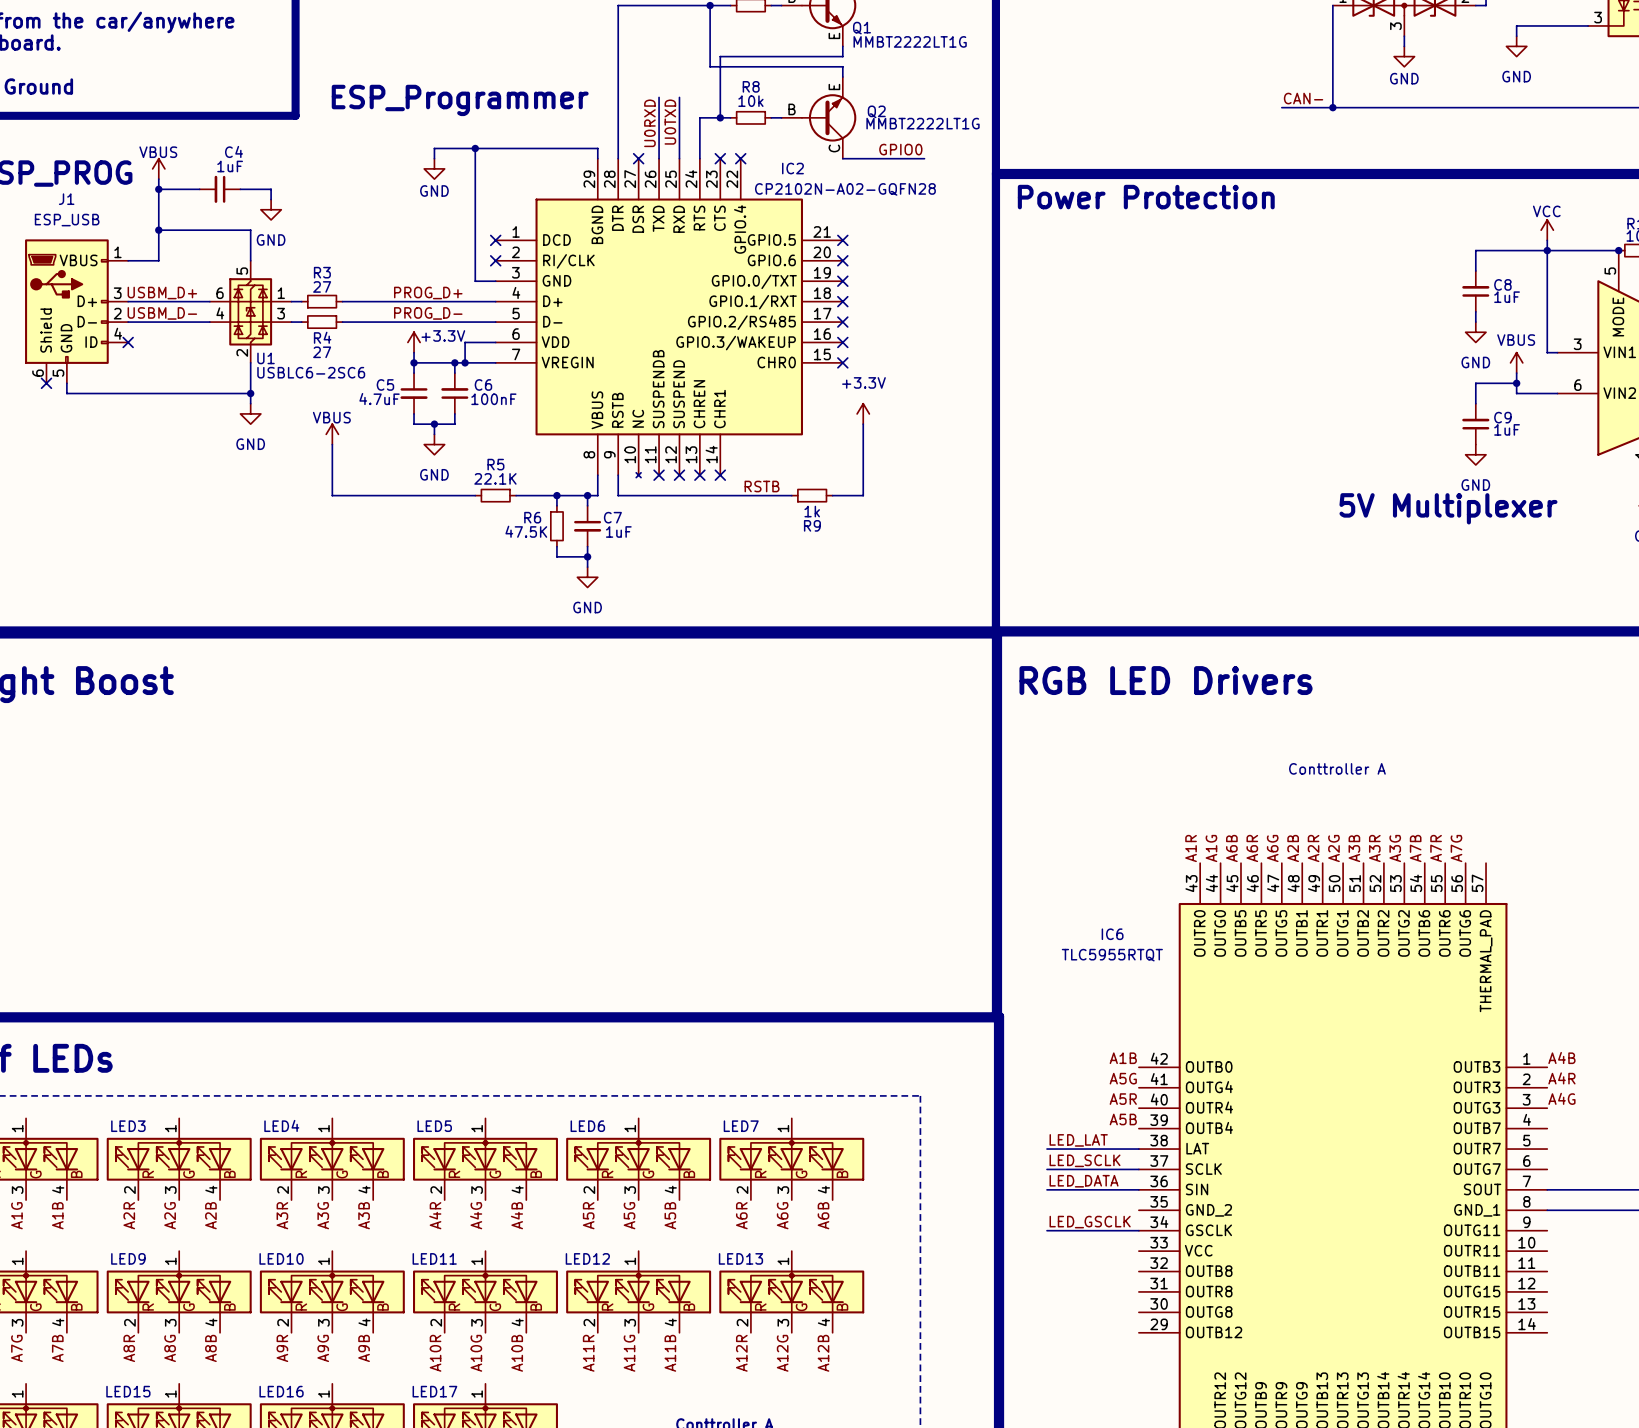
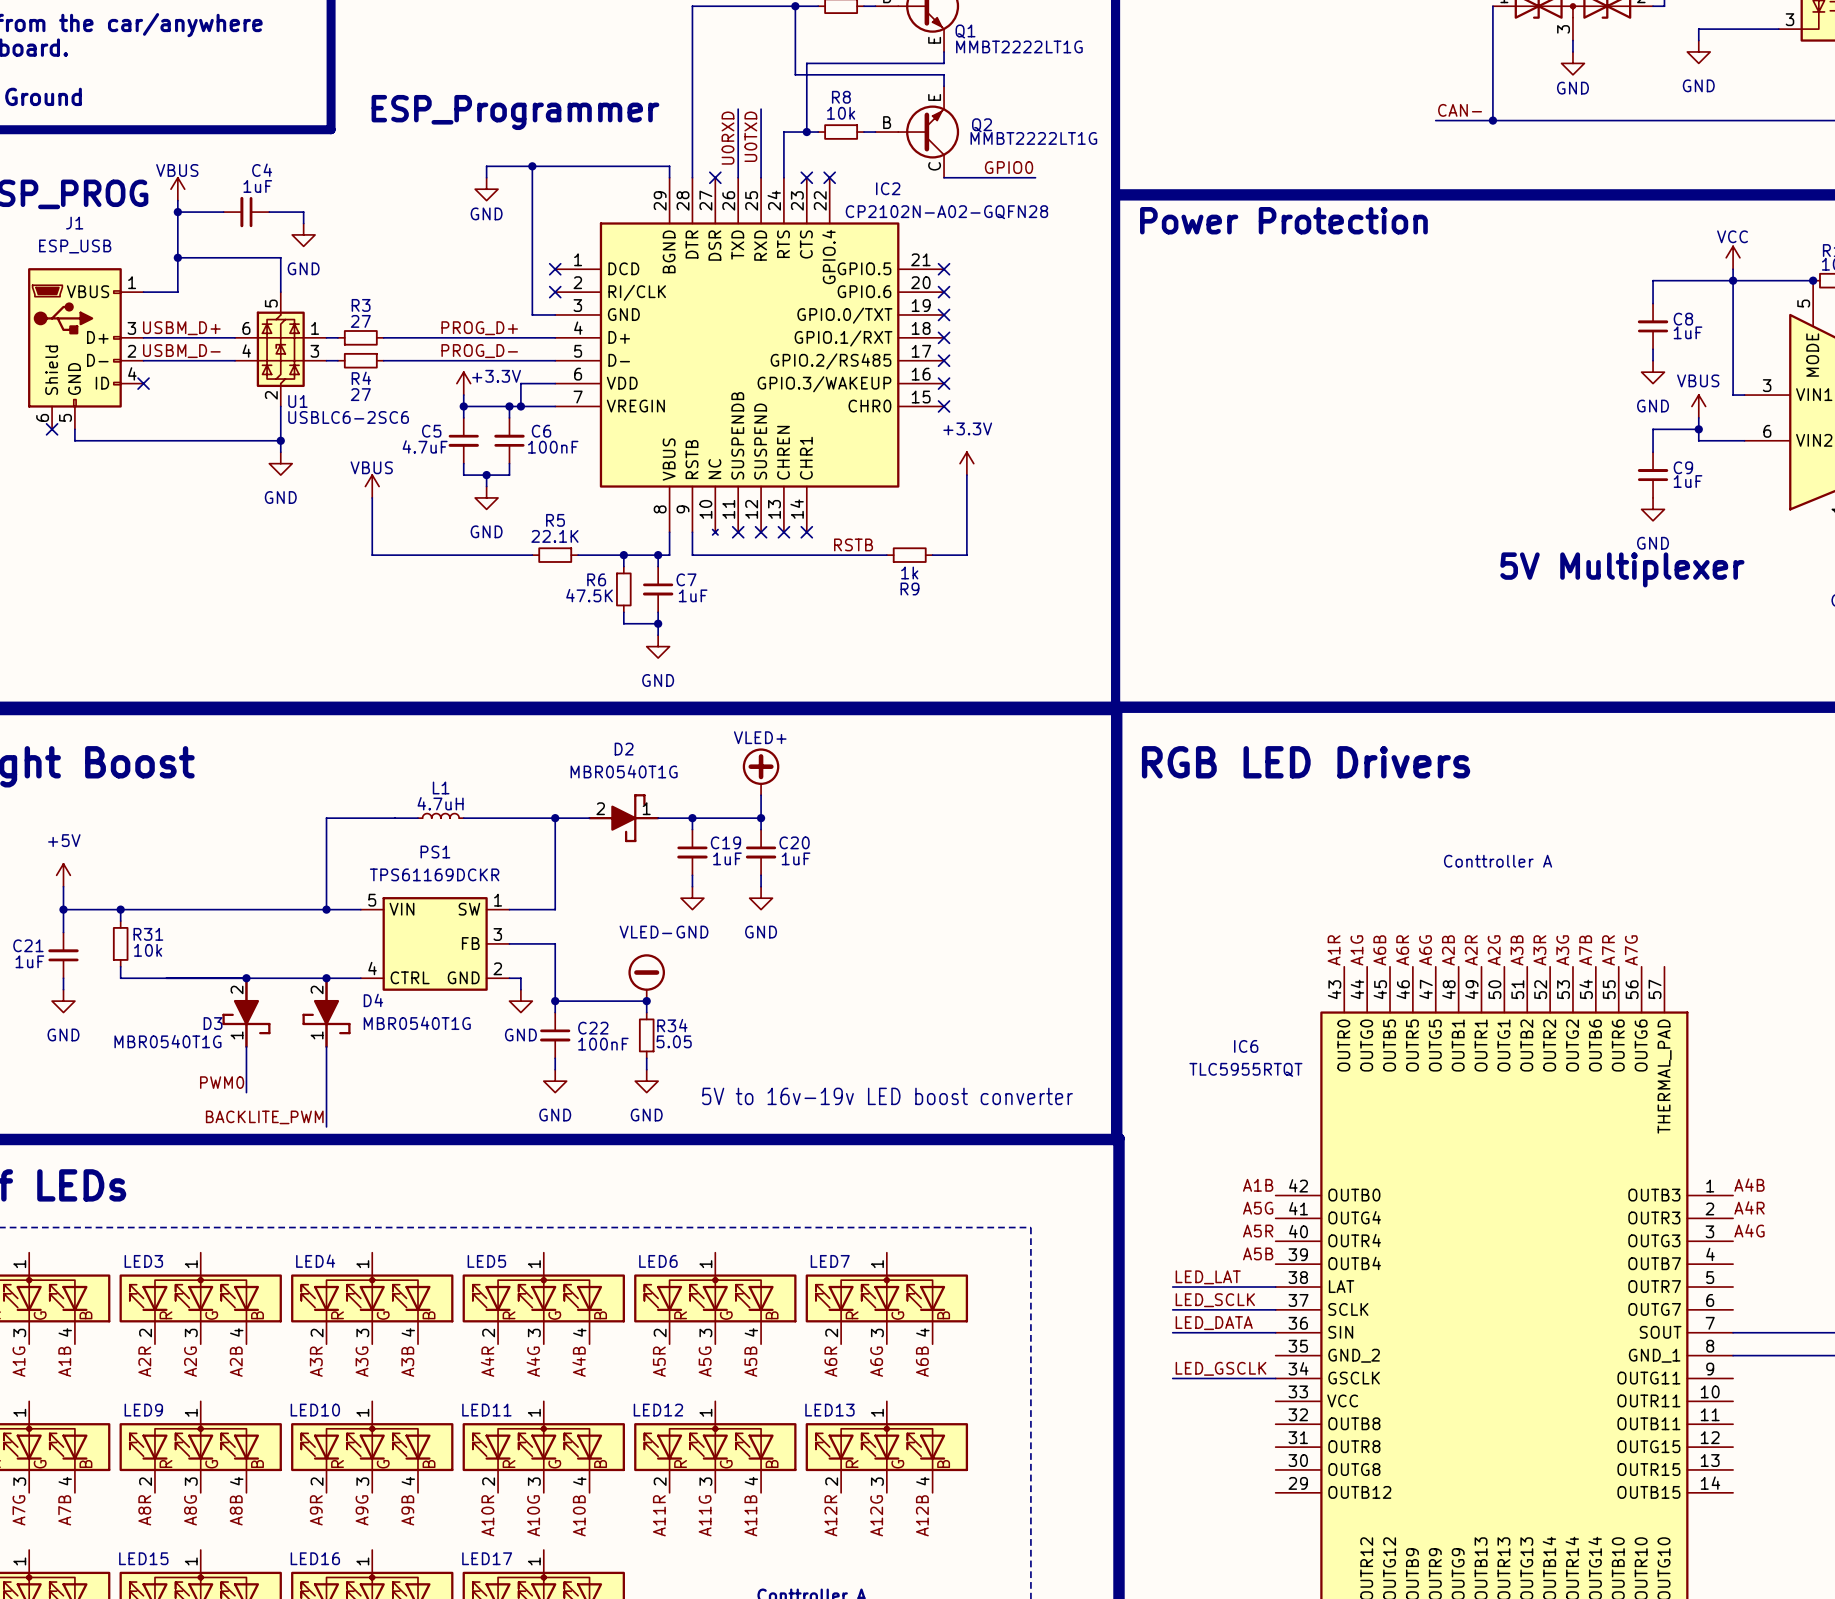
power symbol: none -> VLED+ (761, 771)
wire: none -> (761, 795) (761, 829)
L1: none -> 4.7uH (440, 815)
wire: none -> (417, 818) (326, 818) (326, 909)
wire: none -> (463, 818) (589, 818)
wire: none -> (555, 818) (555, 909) (509, 909)
junction: none -> (555, 818)
D2: none -> MBR0540T1G (623, 818)
wire: none -> (658, 818) (761, 818)
wire: none -> (692, 818) (692, 829)
junction: none -> (692, 818)
junction: none -> (761, 818)
C19: none -> 1uF (692, 852)
C20: none -> 1uF (761, 852)
power symbol: none -> +5V (63, 875)
wire: none -> (692, 875) (692, 886)
wire: none -> (761, 875) (761, 886)
wire: none -> (63, 886) (63, 932)
power symbol: none -> GND (692, 898)
power symbol: none -> GND (761, 898)
wire: none -> (63, 909) (360, 909)
junction: none -> (63, 909)
wire: none -> (120, 909) (120, 921)
junction: none -> (120, 909)
junction: none -> (326, 909)
R31: none -> 10k (120, 943)
PS1: none -> TPS61169DCKR (435, 943)
wire: none -> (509, 943) (555, 943) (555, 1012)
C21: none -> 1uF (63, 955)
wire: none -> (120, 966) (120, 978) (360, 978)
power symbol: none -> VLED- (646, 977)
wire: none -> (63, 978) (63, 989)
junction: none -> (246, 978)
junction: none -> (326, 978)
wire: none -> (509, 978) (520, 978) (520, 989)
power symbol: none -> GND (63, 1001)
power symbol: none -> GND (520, 1001)
wire: none -> (555, 1001) (646, 1001) (646, 1012)
junction: none -> (555, 1001)
junction: none -> (646, 1001)
D3: none -> MBR0540T1G (246, 1012)
D4: none -> MBR0540T1G (326, 1012)
C22: none -> 100nF (555, 1035)
R34: none -> 5.05 (646, 1035)
wire: none -> (246, 1046) (246, 1092)
wire: none -> (326, 1046) (326, 1126)
wire: none -> (555, 1058) (555, 1069)
wire: none -> (646, 1058) (646, 1069)
power symbol: none -> GND (555, 1081)
power symbol: none -> GND (646, 1081)
label: none -> PWM0 (222, 1082)
text: none -> 5V to 16v-19v LED boost converter (887, 1096)
label: none -> BACKLITE_PWM (264, 1117)

